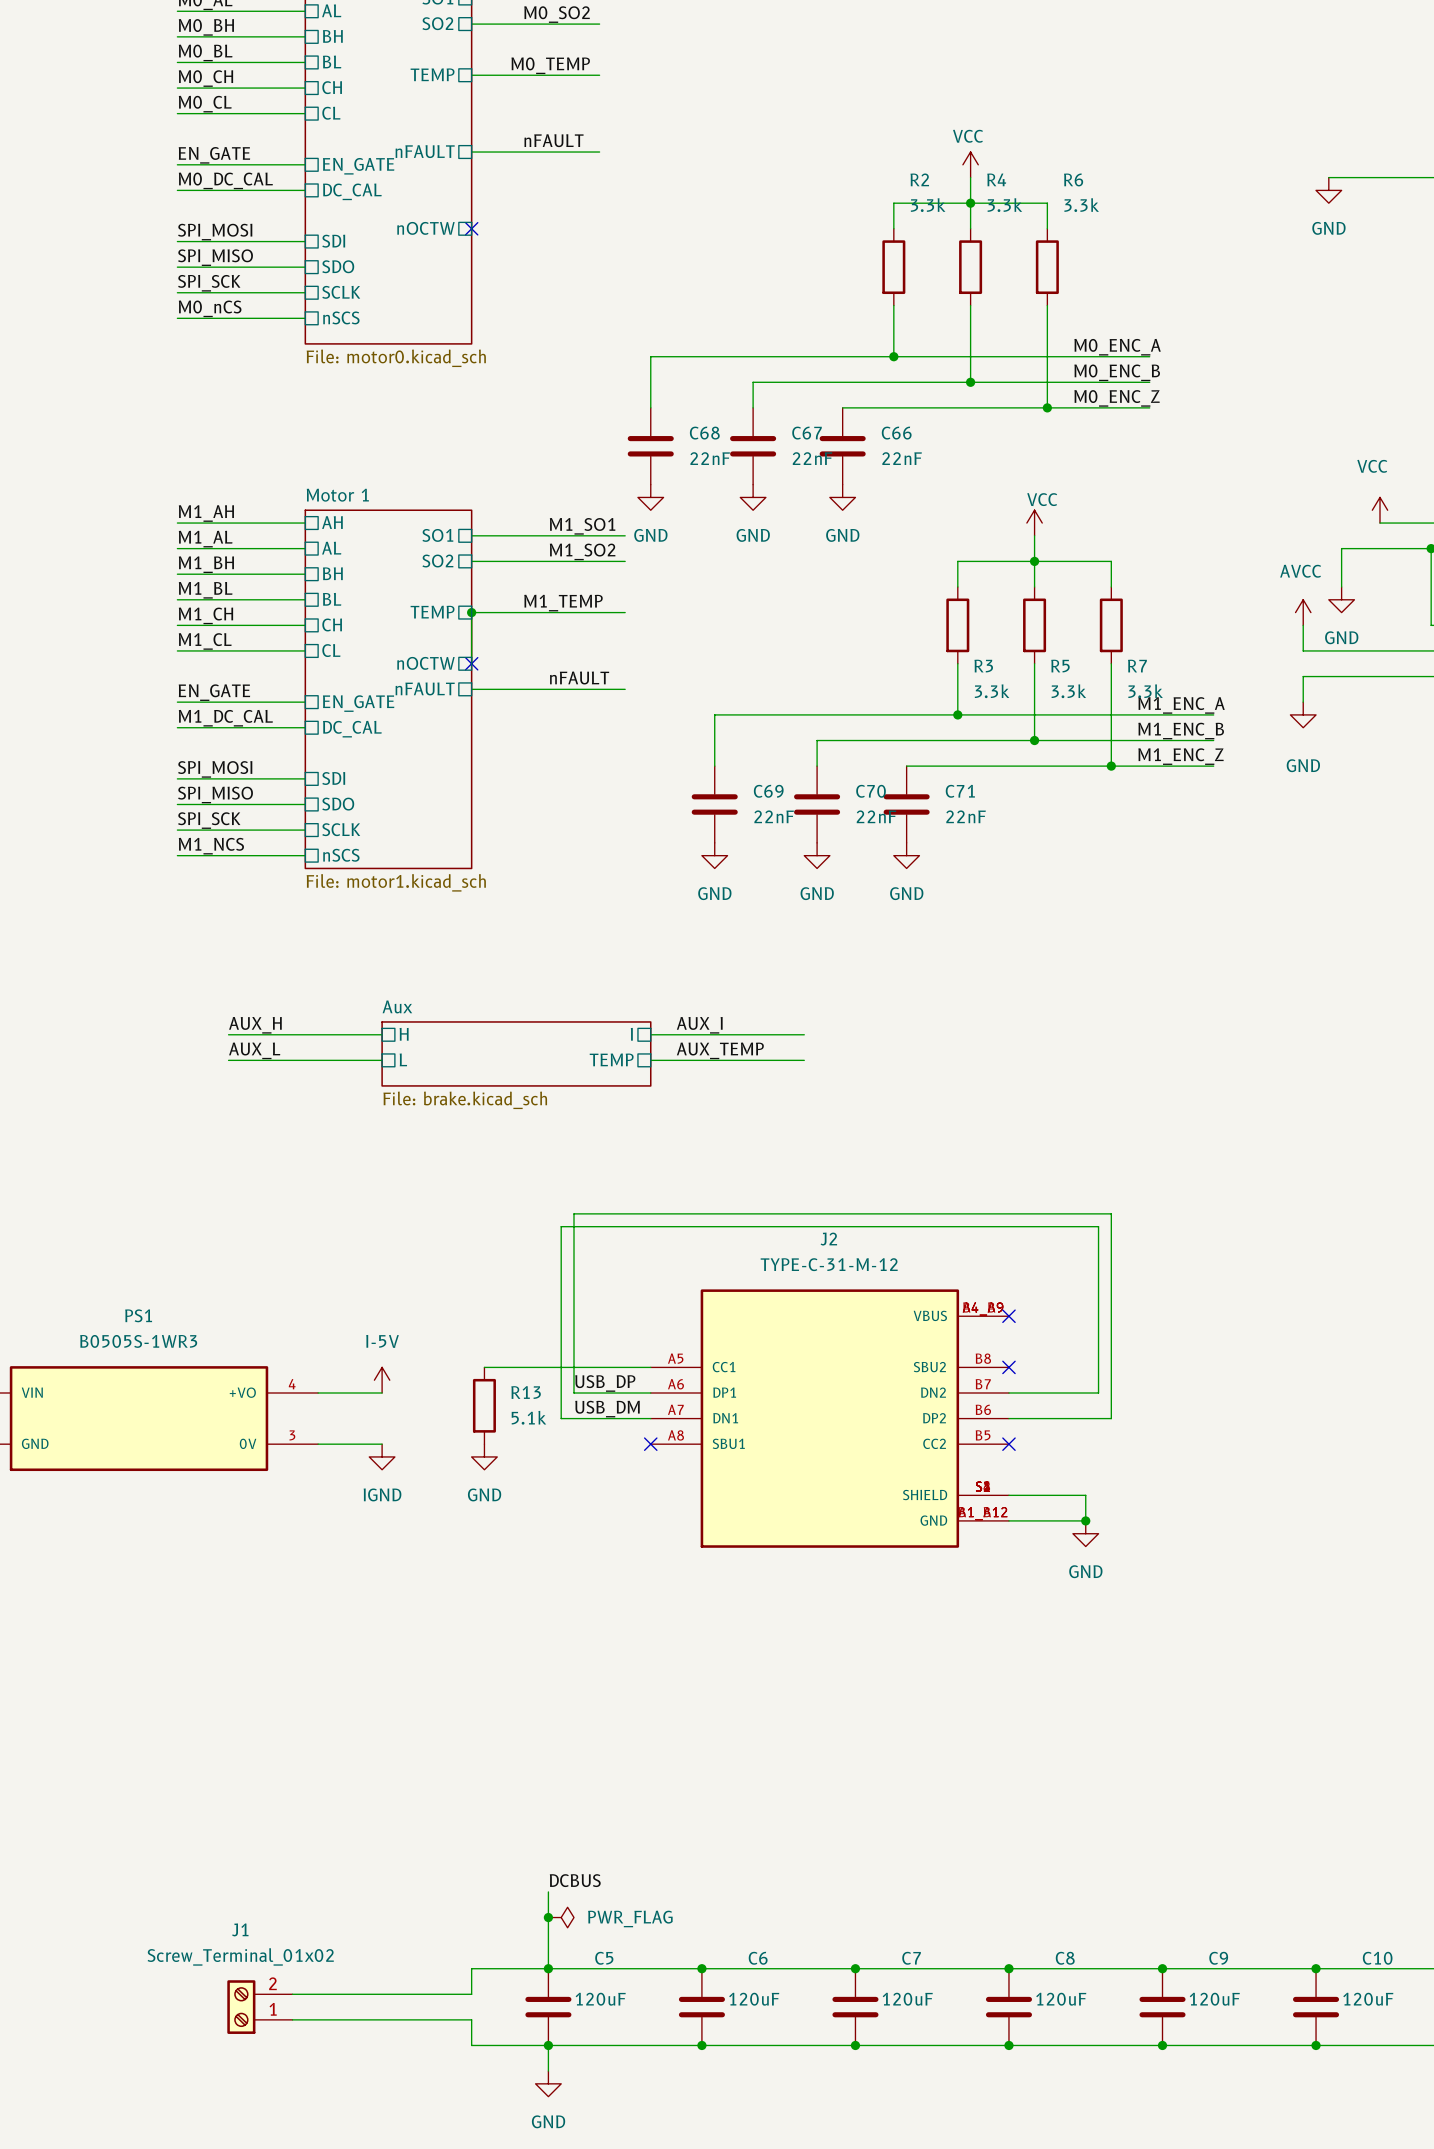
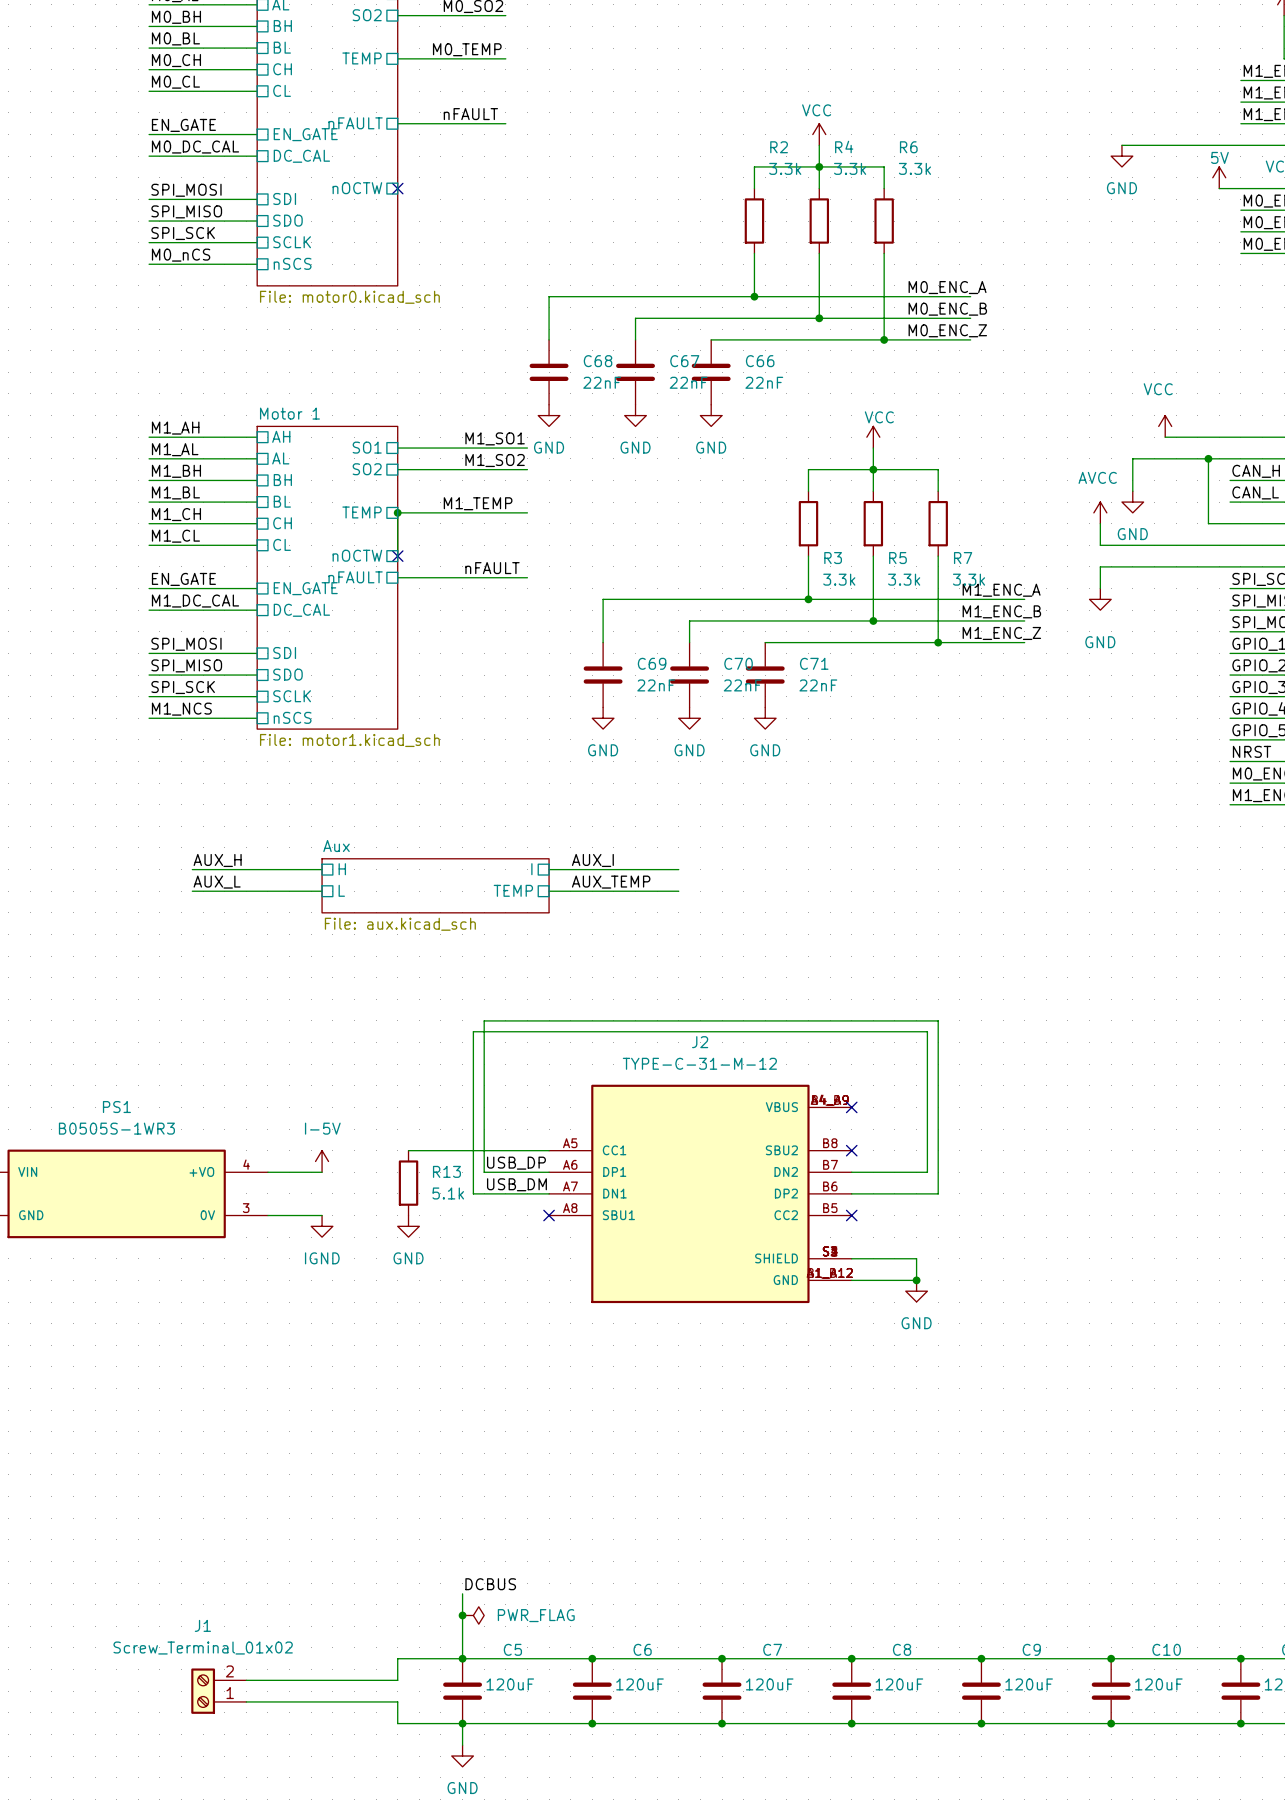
sheet Aux value: File: brake.kicad_sch (465, 1100) -> File: aux.kicad_sch (400, 924)

